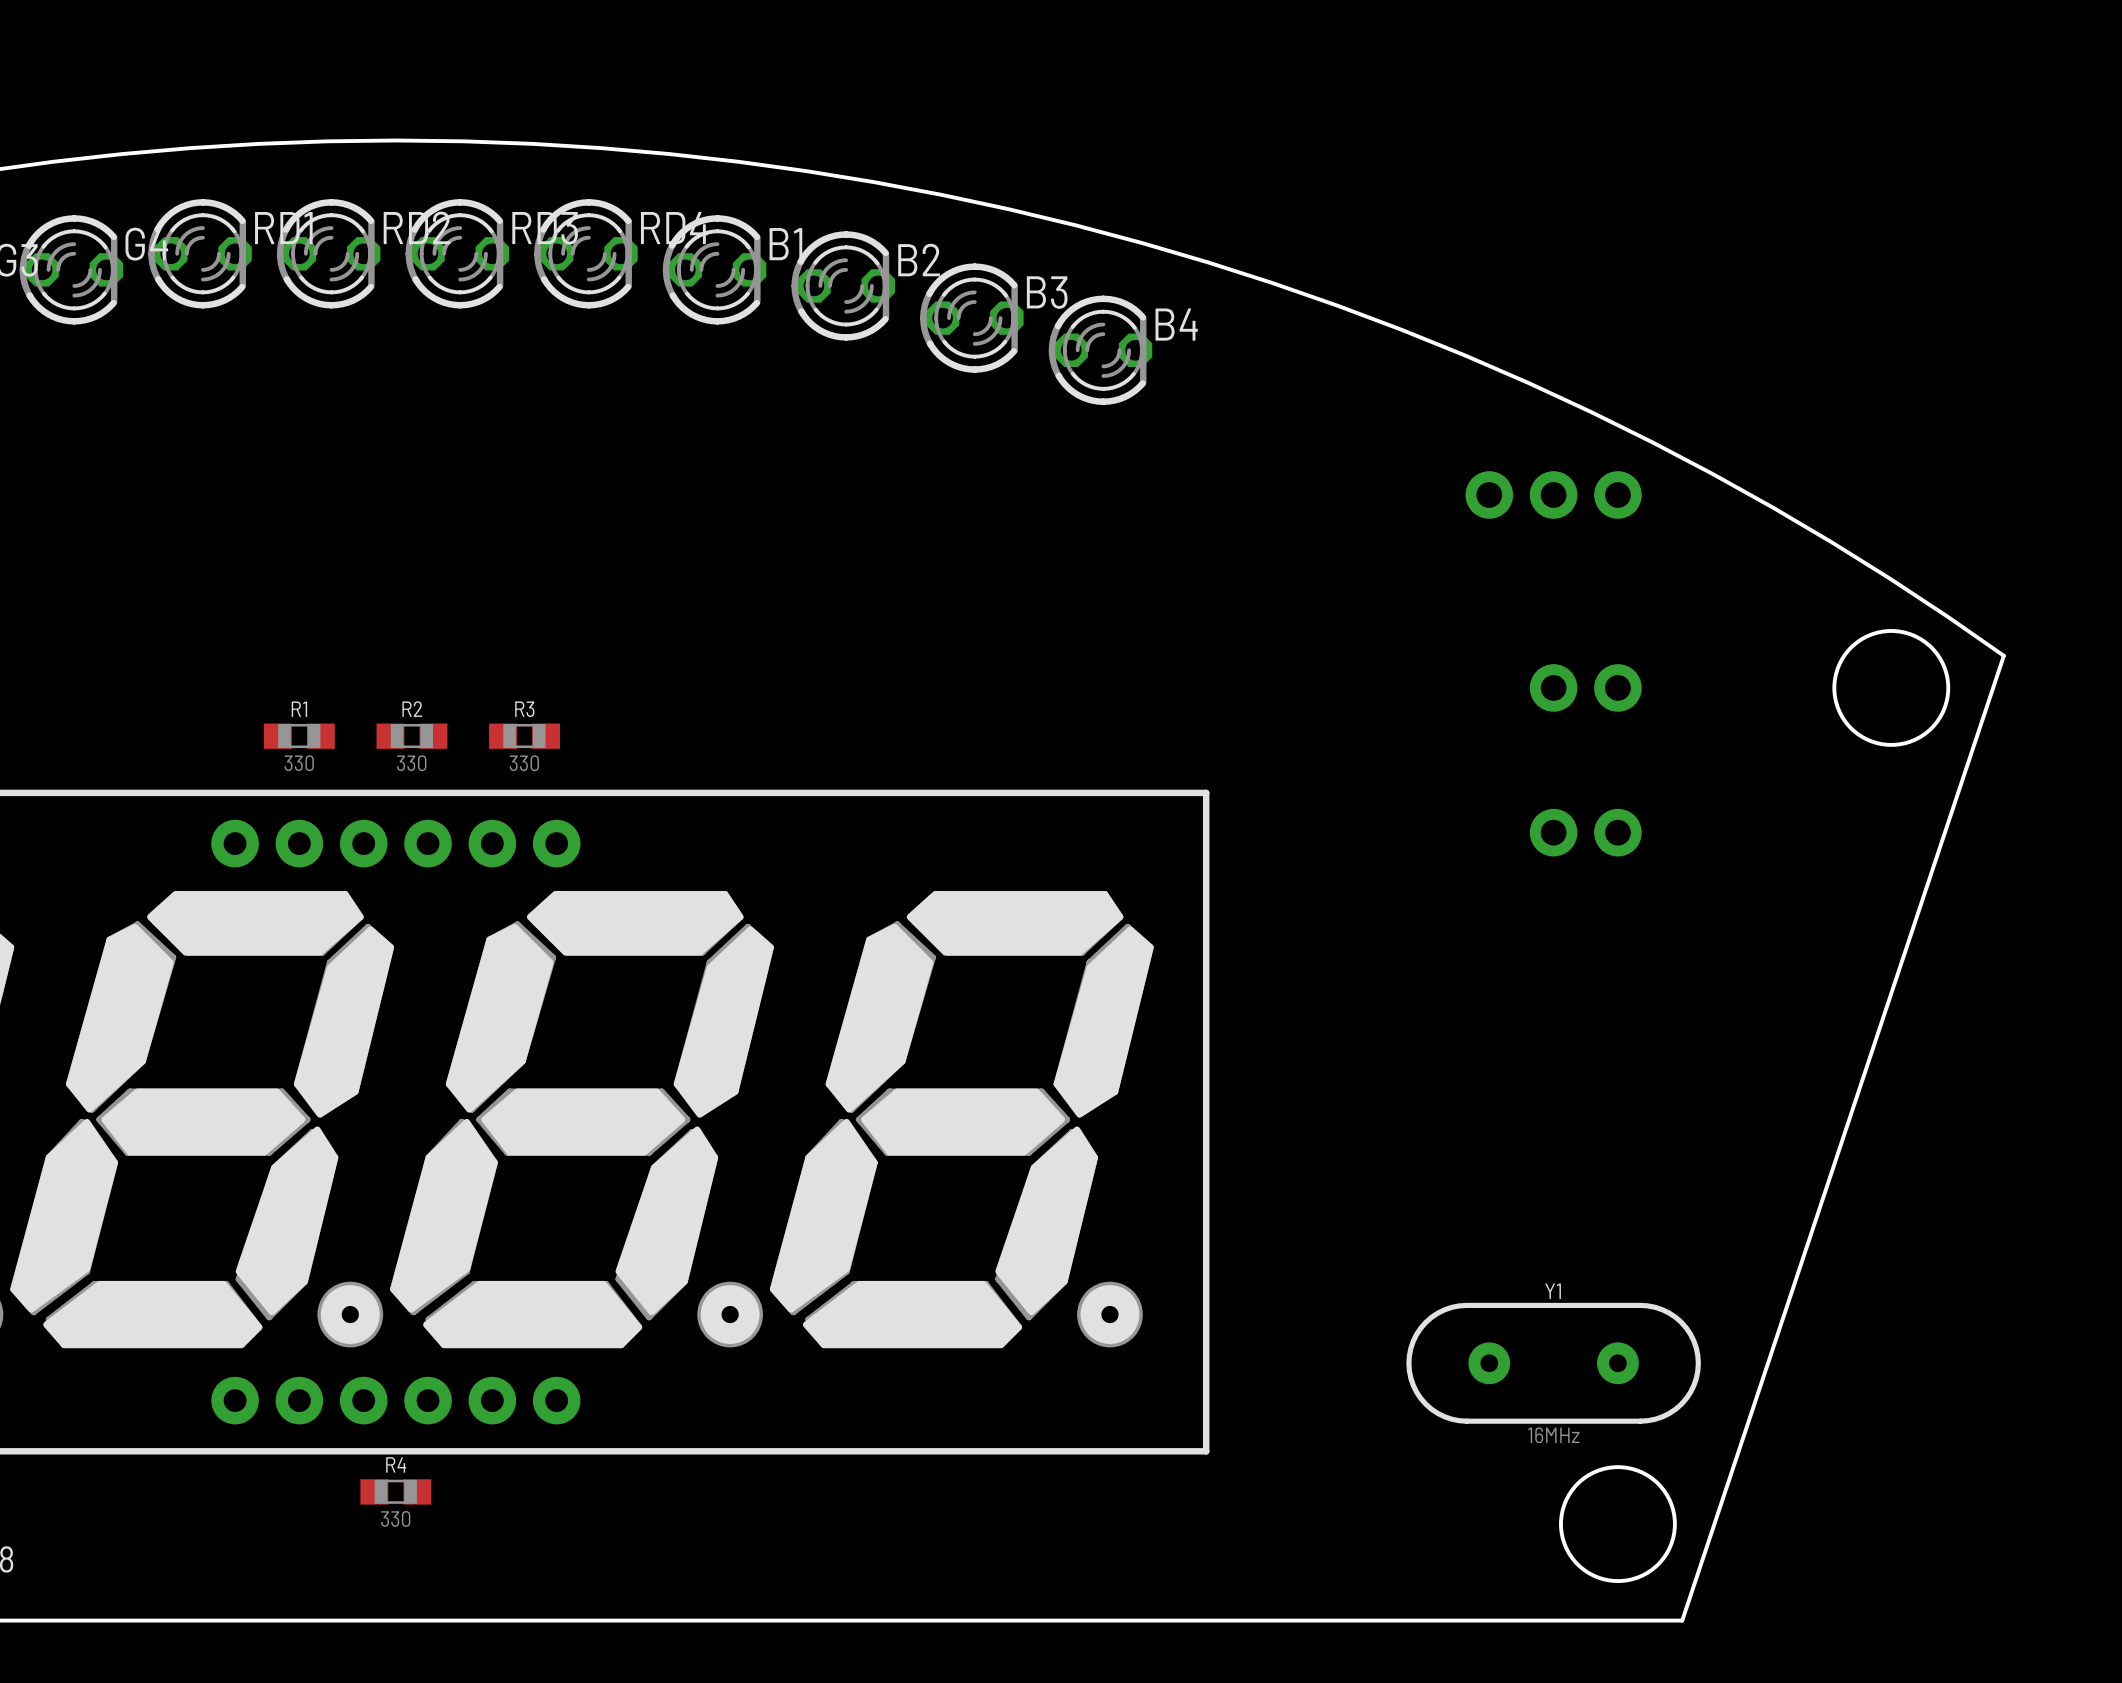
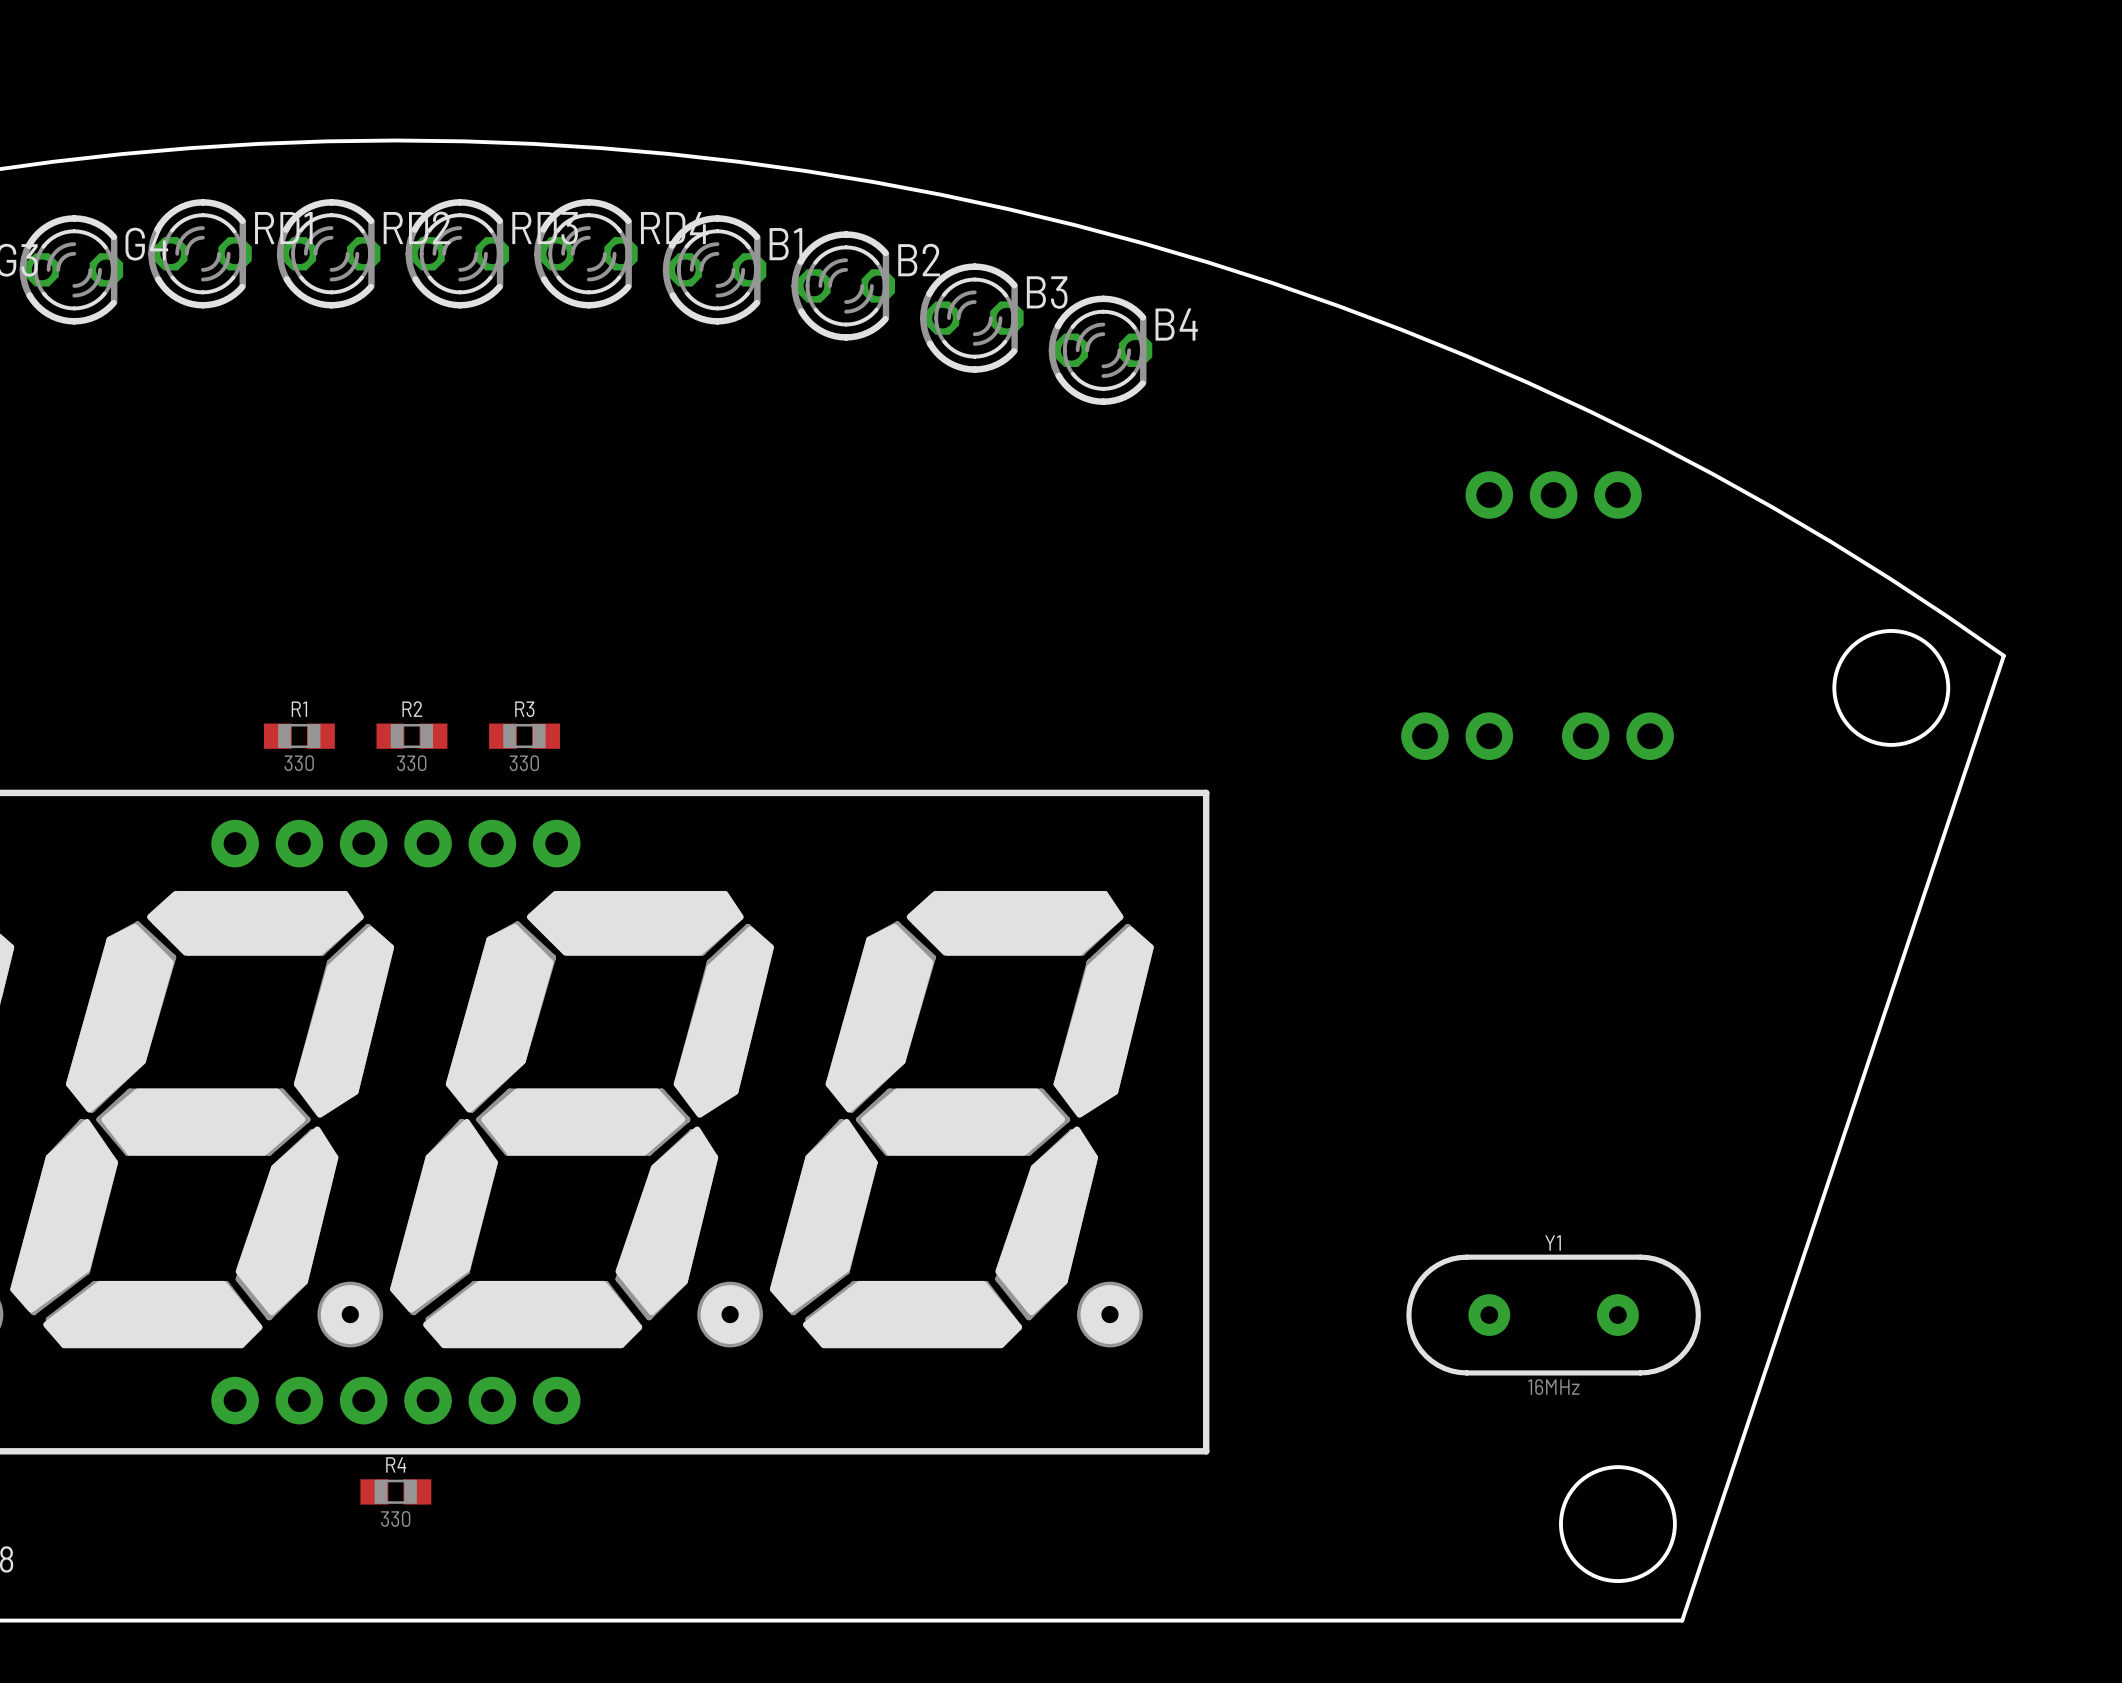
part: (1585, 687) -> none
part: none -> (1457, 736)
part: none -> (1617, 736)
part: (1585, 832) -> none
Y1 position: (1553, 1363) -> (1553, 1315)

